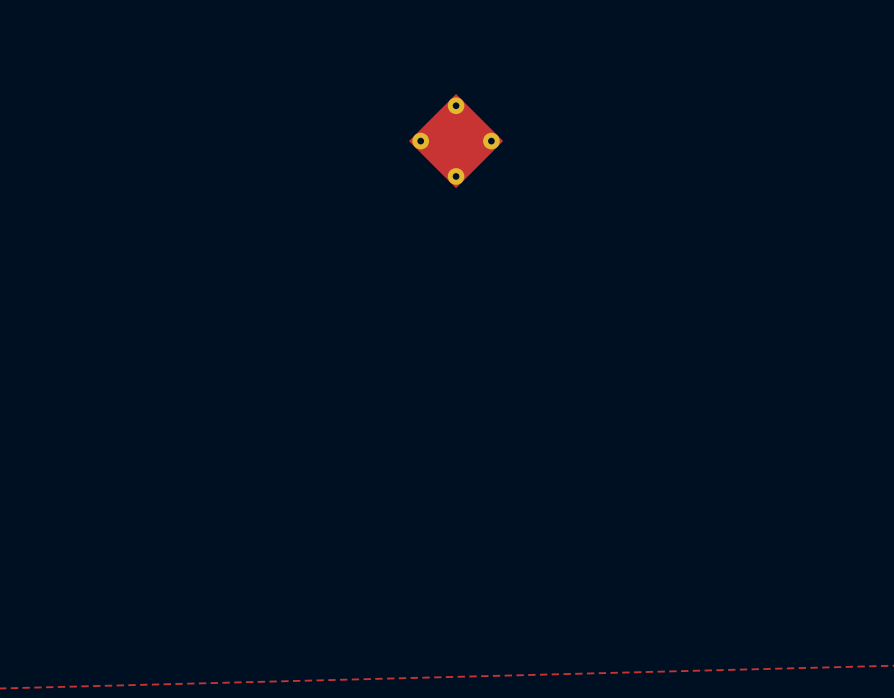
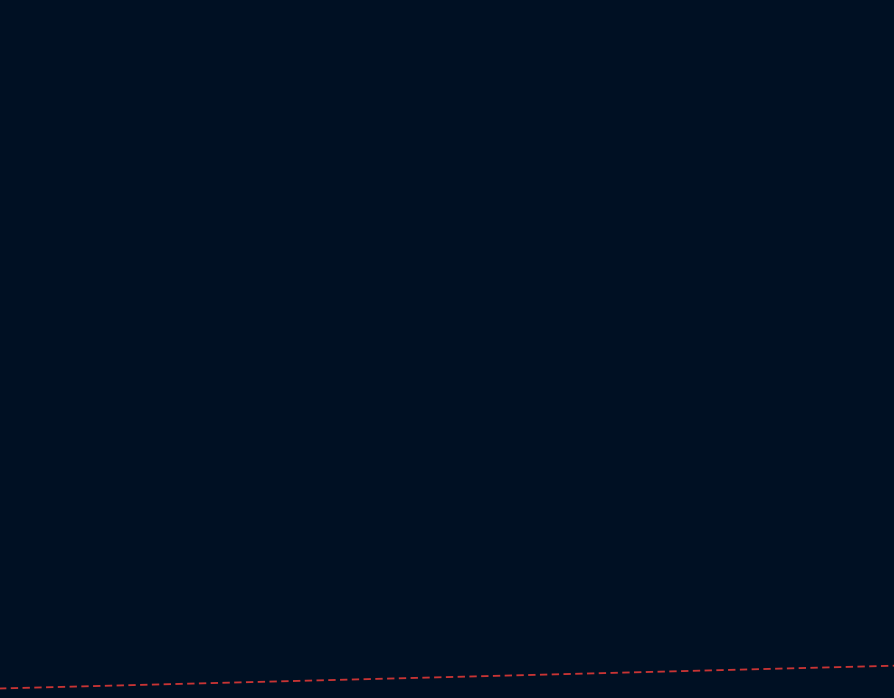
part: (456, 141) -> none

